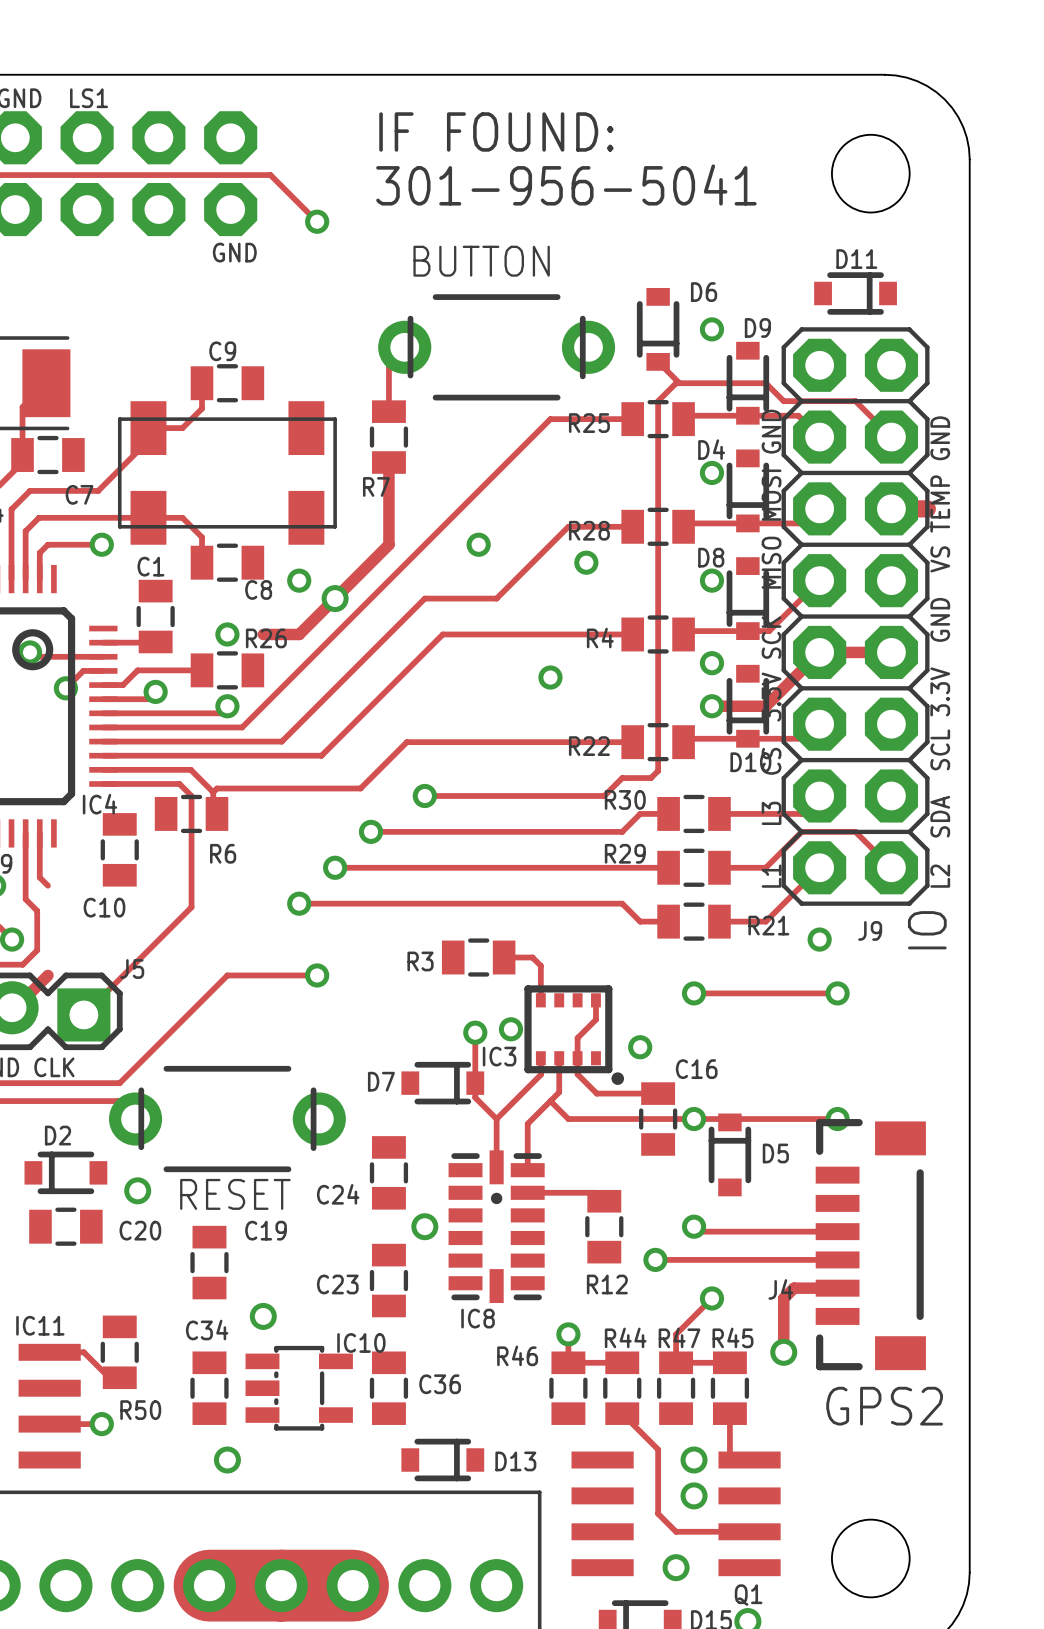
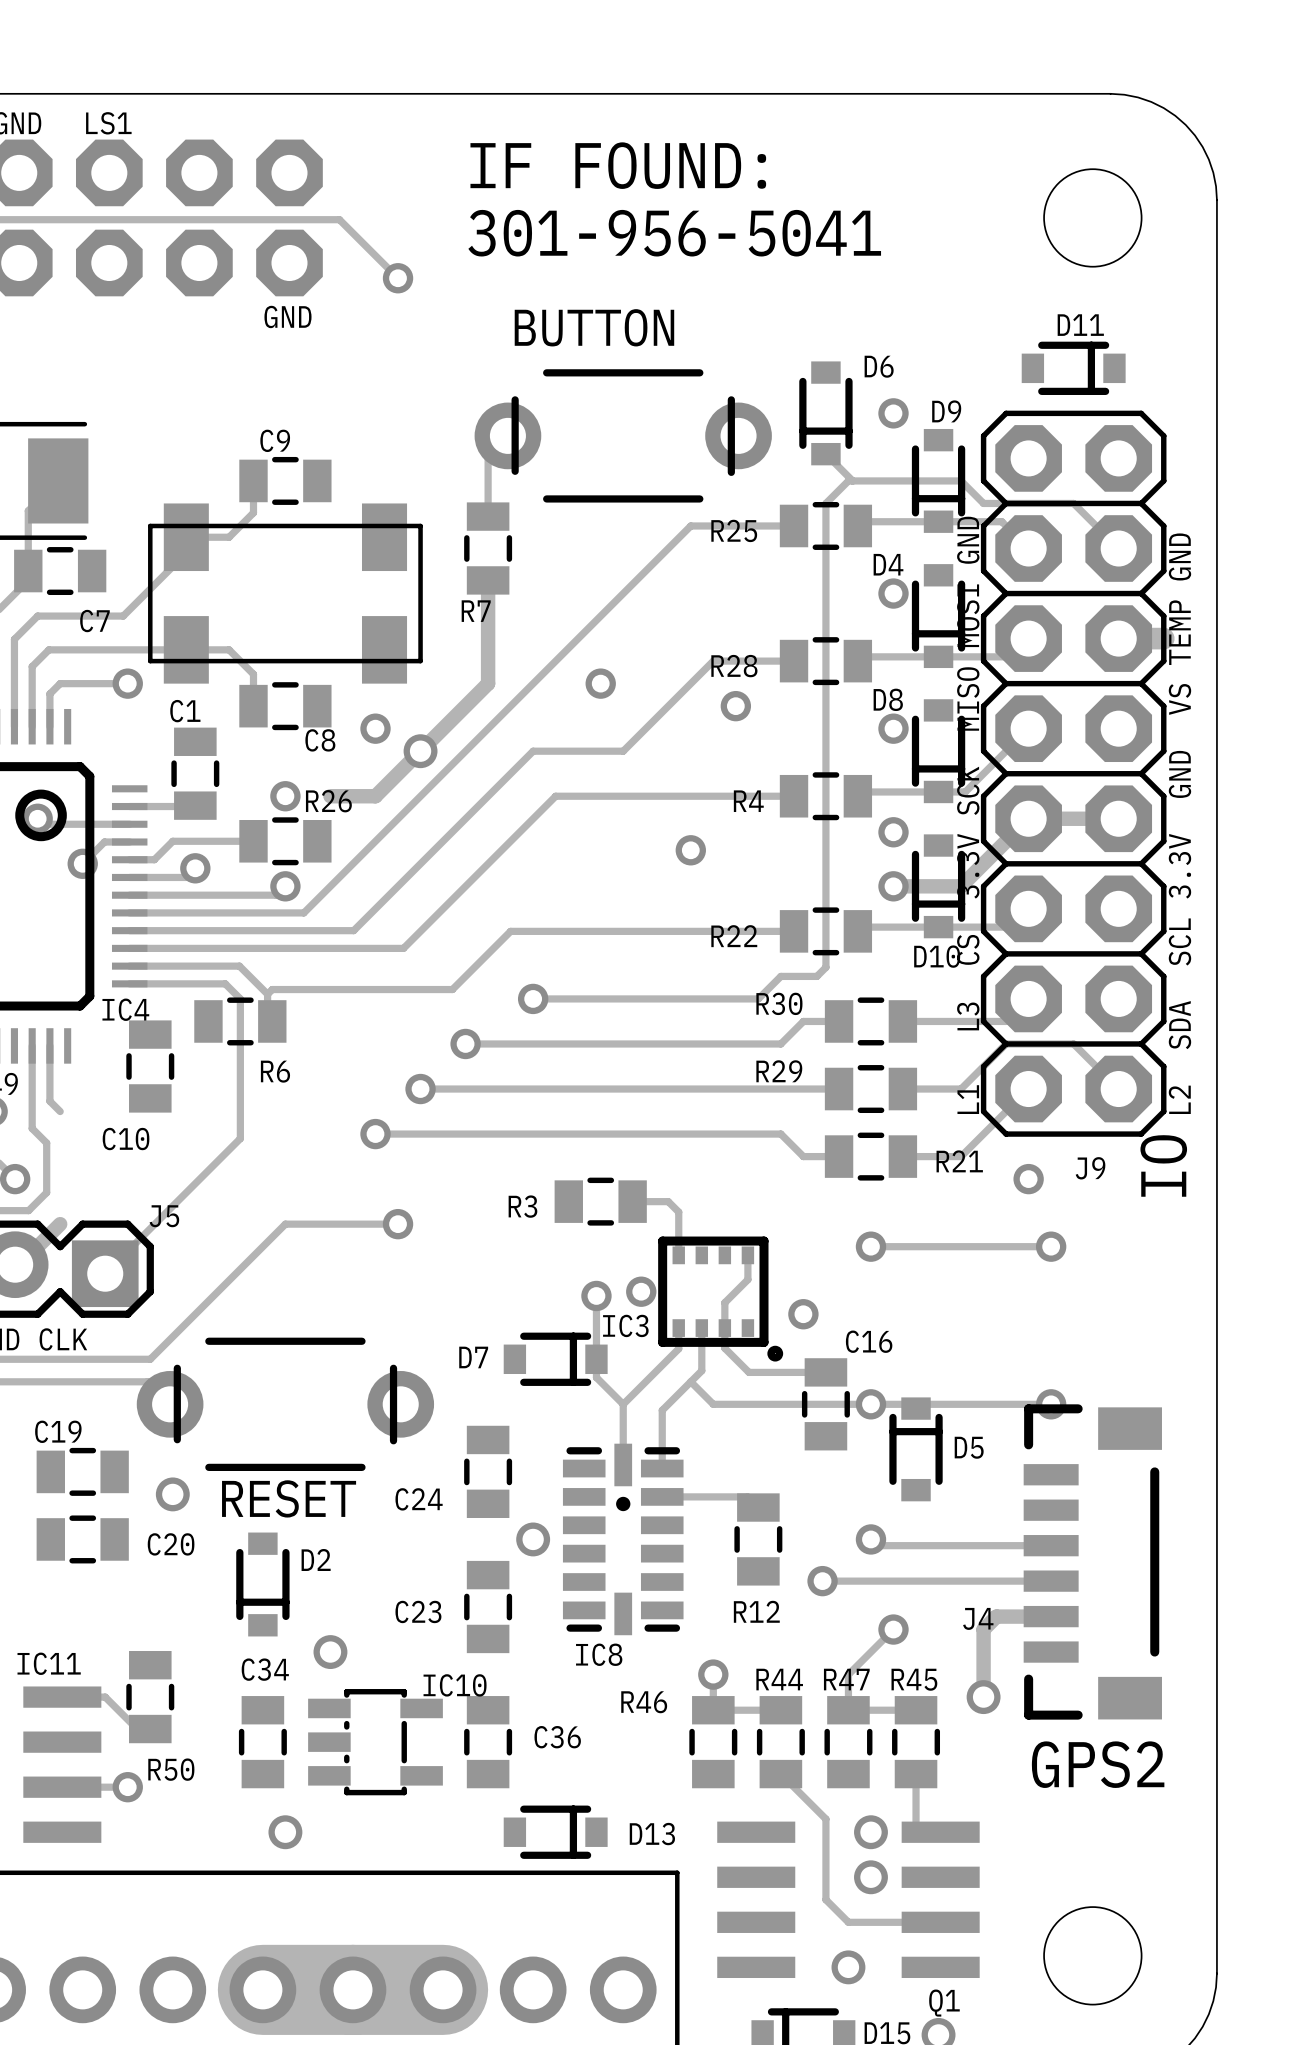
D2 name position: D2 (58, 1135) -> D2 (316, 1559)
D2 rotation: 0° (65, 1172) -> 90° counterclockwise (262, 1584)
D2 position: (65, 1172) -> (262, 1584)
C19 name position: C19 (266, 1230) -> C19 (58, 1431)
C19 rotation: 0° (209, 1262) -> 90° clockwise (82, 1471)
C19 position: (209, 1262) -> (82, 1471)

